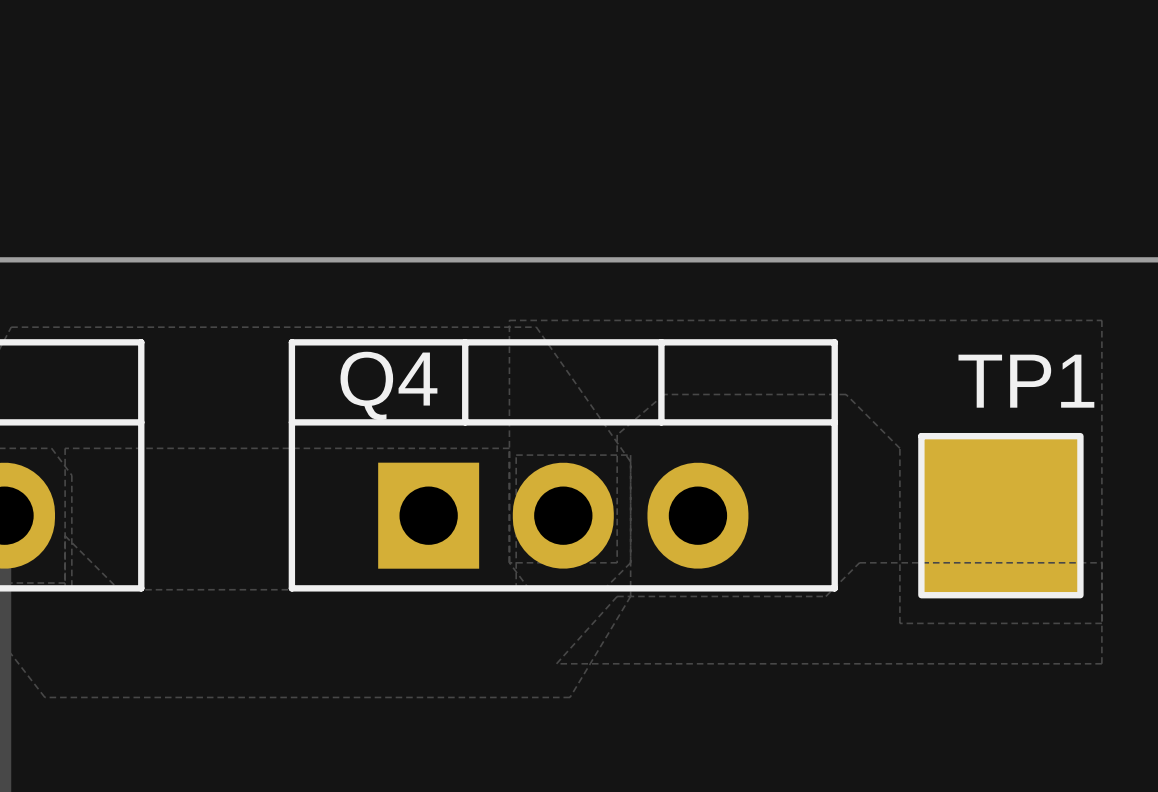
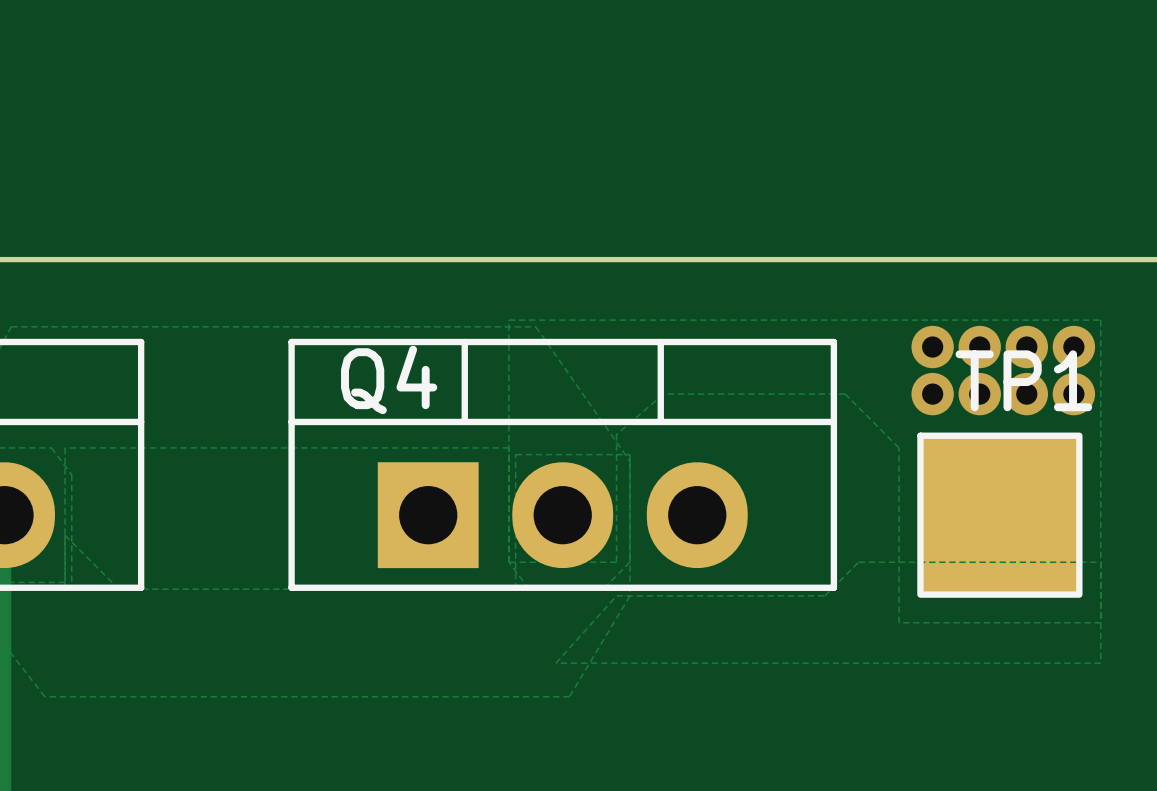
via: none -> (932, 347)
via: none -> (979, 347)
via: none -> (1026, 347)
via: none -> (1073, 347)
via: none -> (932, 394)
via: none -> (979, 394)
via: none -> (1026, 394)
via: none -> (1073, 394)

